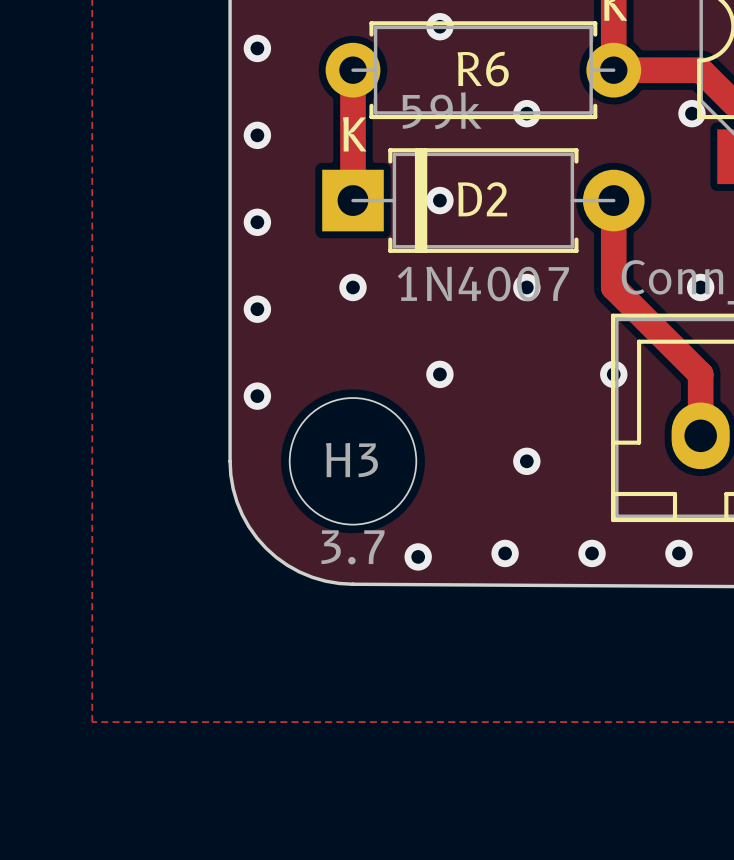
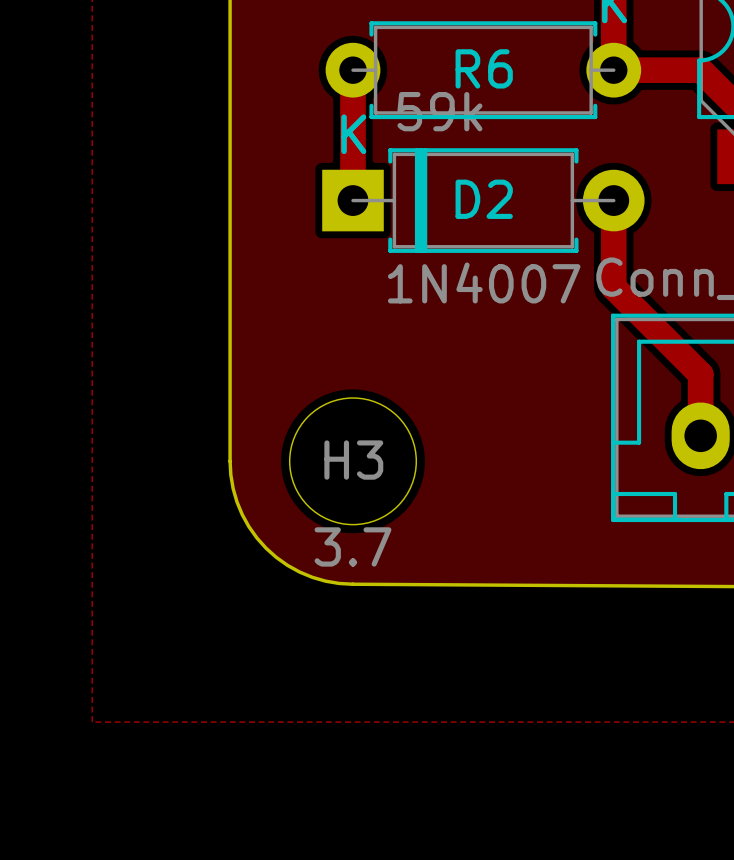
via: (439, 26) -> none
via: (257, 48) -> none
via: (526, 113) -> none
via: (691, 113) -> none
via: (257, 135) -> none
via: (439, 200) -> none
via: (257, 222) -> none
via: (352, 287) -> none
via: (526, 287) -> none
via: (700, 287) -> none
via: (257, 309) -> none
via: (439, 374) -> none
via: (613, 374) -> none
via: (257, 396) -> none
via: (526, 461) -> none
via: (505, 553) -> none
via: (592, 553) -> none
via: (678, 553) -> none
via: (418, 556) -> none

